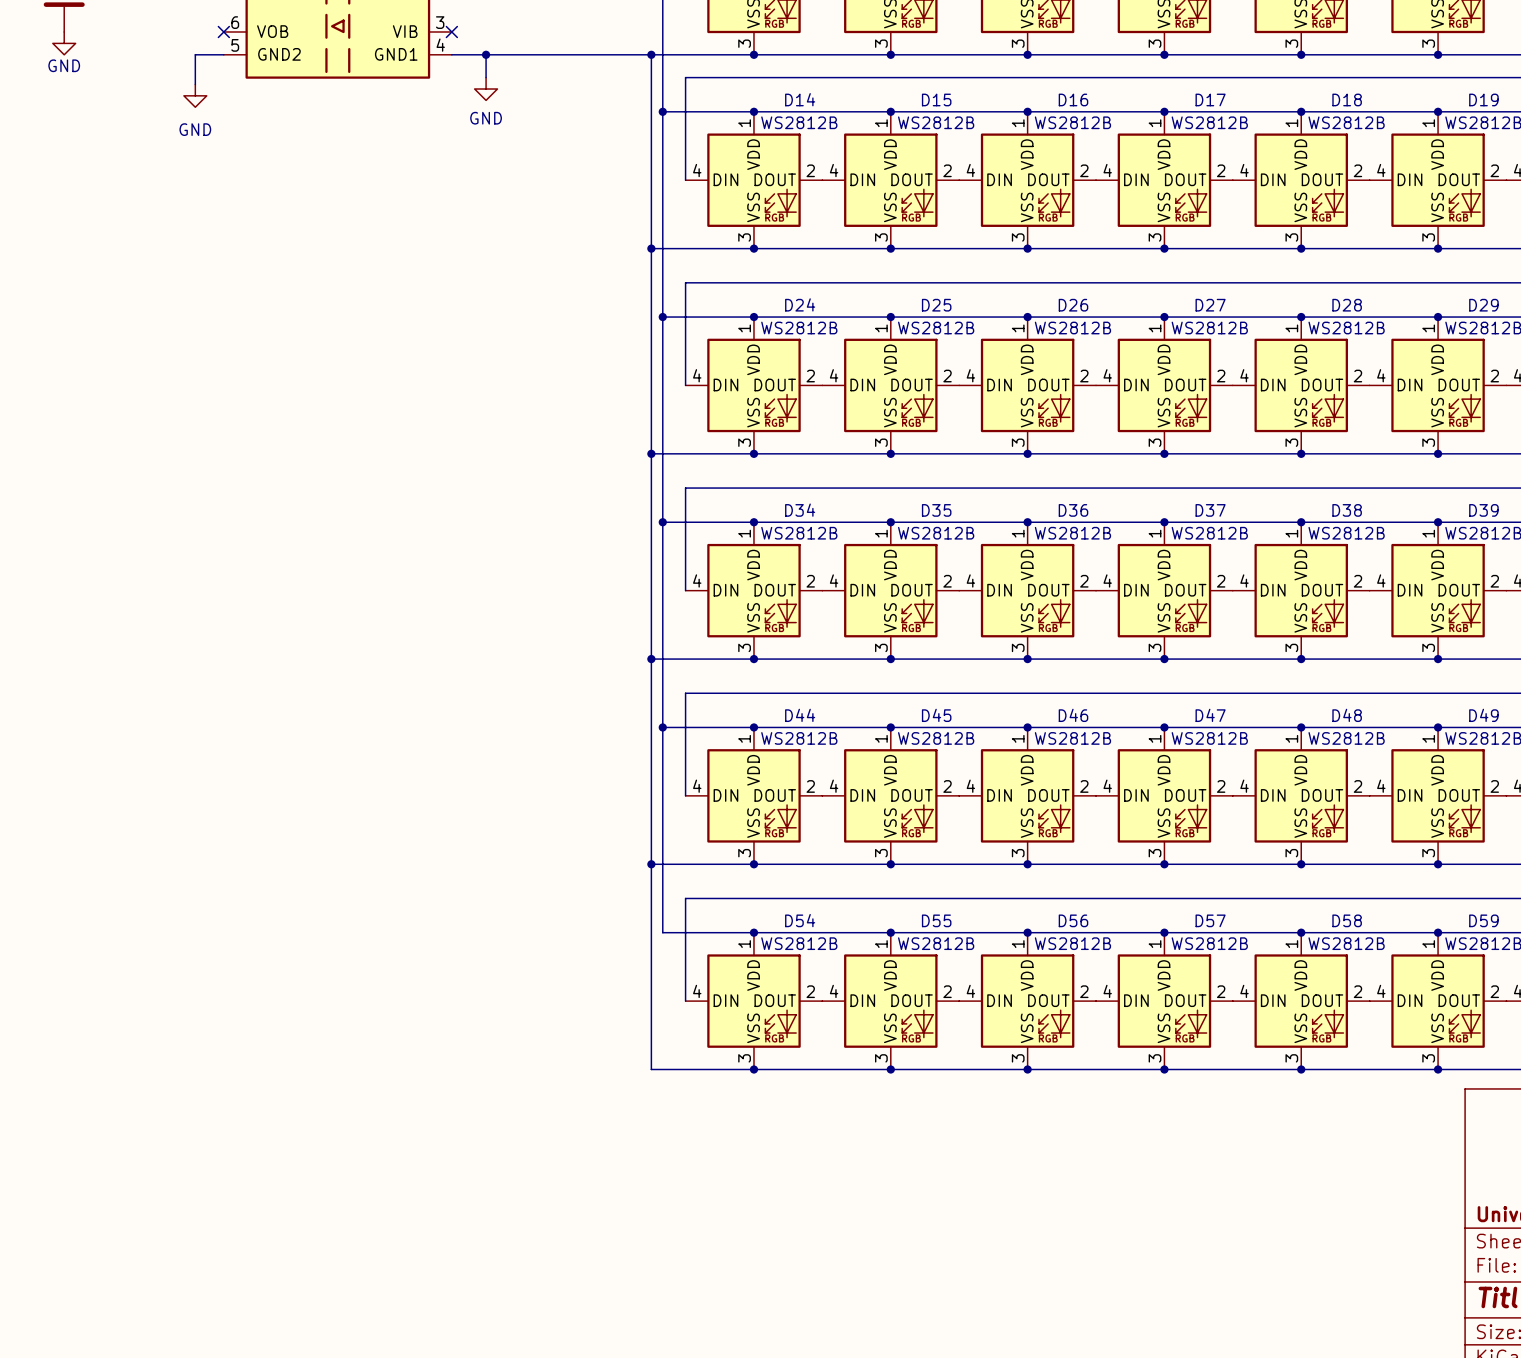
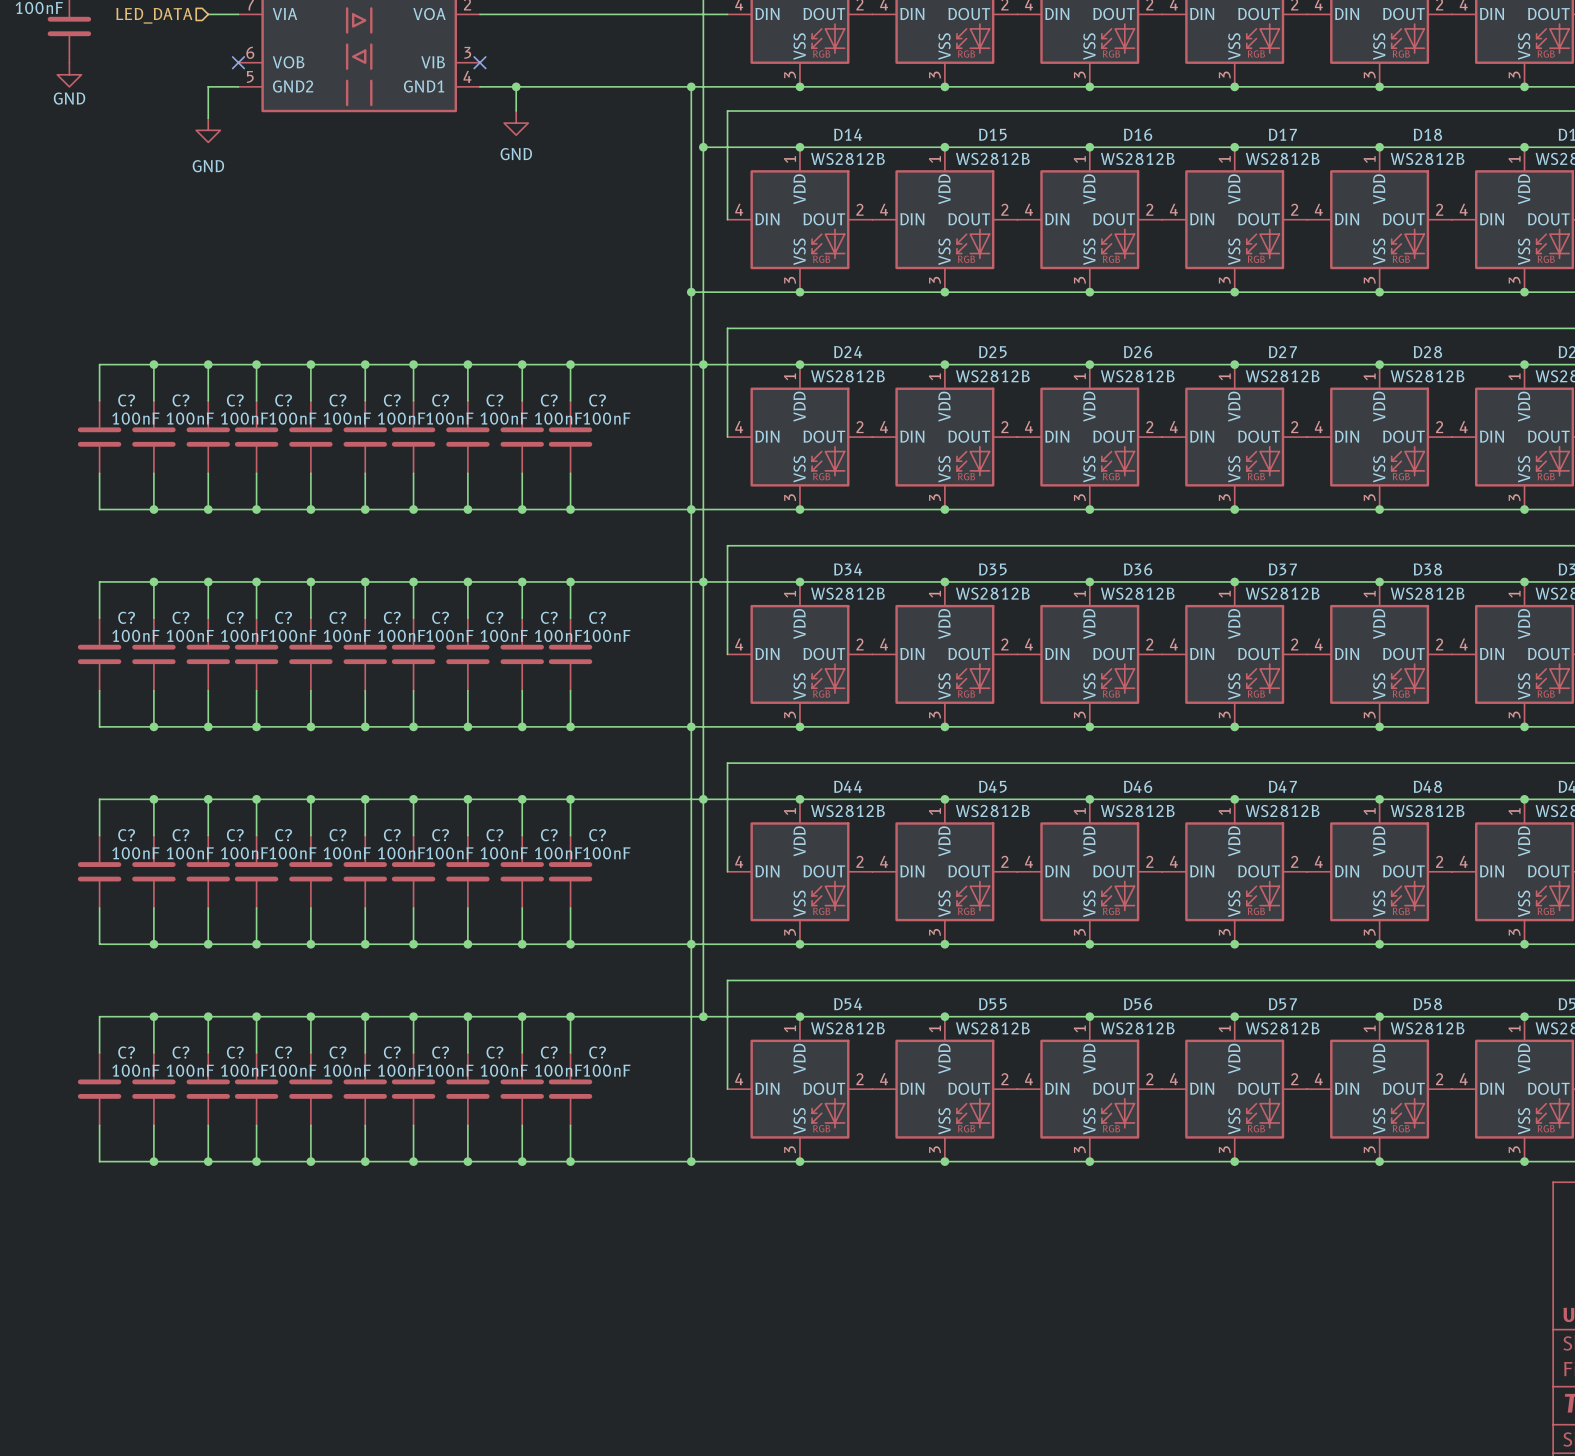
wire: none -> (153, 364) (153, 400)
junction: none -> (153, 364)
wire: none -> (208, 364) (208, 400)
junction: none -> (208, 364)
wire: none -> (256, 364) (256, 400)
junction: none -> (256, 364)
wire: none -> (310, 364) (310, 400)
junction: none -> (310, 364)
wire: none -> (365, 364) (365, 400)
junction: none -> (365, 364)
wire: none -> (413, 364) (413, 400)
junction: none -> (413, 364)
wire: none -> (467, 364) (467, 400)
junction: none -> (467, 364)
wire: none -> (522, 364) (522, 400)
junction: none -> (522, 364)
wire: none -> (570, 364) (570, 400)
junction: none -> (570, 364)
wire: none -> (703, 364) (99, 364) (99, 400)
C?: none -> 100nF (99, 437)
C?: none -> 100nF (153, 437)
C?: none -> 100nF (208, 437)
C?: none -> 100nF (256, 437)
C?: none -> 100nF (310, 437)
C?: none -> 100nF (365, 437)
C?: none -> 100nF (413, 437)
C?: none -> 100nF (467, 437)
C?: none -> 100nF (522, 437)
C?: none -> 100nF (570, 437)
wire: none -> (99, 473) (99, 509) (691, 509)
wire: none -> (153, 473) (153, 509)
wire: none -> (208, 473) (208, 509)
wire: none -> (256, 473) (256, 509)
wire: none -> (310, 473) (310, 509)
wire: none -> (365, 473) (365, 509)
wire: none -> (413, 473) (413, 509)
wire: none -> (467, 473) (467, 509)
wire: none -> (522, 473) (522, 509)
wire: none -> (570, 473) (570, 509)
junction: none -> (153, 509)
junction: none -> (208, 509)
junction: none -> (256, 509)
junction: none -> (310, 509)
junction: none -> (365, 509)
junction: none -> (413, 509)
junction: none -> (467, 509)
junction: none -> (522, 509)
junction: none -> (570, 509)
wire: none -> (153, 581) (153, 618)
junction: none -> (153, 581)
wire: none -> (208, 581) (208, 618)
junction: none -> (208, 581)
wire: none -> (256, 581) (256, 618)
junction: none -> (256, 581)
wire: none -> (310, 581) (310, 618)
junction: none -> (310, 581)
wire: none -> (365, 581) (365, 618)
junction: none -> (365, 581)
wire: none -> (413, 581) (413, 618)
junction: none -> (413, 581)
wire: none -> (467, 581) (467, 618)
junction: none -> (467, 581)
wire: none -> (522, 581) (522, 618)
junction: none -> (522, 581)
wire: none -> (570, 581) (570, 618)
junction: none -> (570, 581)
wire: none -> (703, 581) (99, 581) (99, 618)
C?: none -> 100nF (99, 654)
C?: none -> 100nF (153, 654)
C?: none -> 100nF (208, 654)
C?: none -> 100nF (256, 654)
C?: none -> 100nF (310, 654)
C?: none -> 100nF (365, 654)
C?: none -> 100nF (413, 654)
C?: none -> 100nF (467, 654)
C?: none -> 100nF (522, 654)
C?: none -> 100nF (570, 654)
wire: none -> (99, 690) (99, 726) (691, 726)
wire: none -> (153, 690) (153, 726)
wire: none -> (208, 690) (208, 726)
wire: none -> (256, 690) (256, 726)
wire: none -> (310, 690) (310, 726)
wire: none -> (365, 690) (365, 726)
wire: none -> (413, 690) (413, 726)
wire: none -> (467, 690) (467, 726)
wire: none -> (522, 690) (522, 726)
wire: none -> (570, 690) (570, 726)
junction: none -> (153, 726)
junction: none -> (208, 726)
junction: none -> (256, 726)
junction: none -> (310, 726)
junction: none -> (365, 726)
junction: none -> (413, 726)
junction: none -> (467, 726)
junction: none -> (522, 726)
junction: none -> (570, 726)
wire: none -> (153, 799) (153, 835)
junction: none -> (153, 799)
wire: none -> (208, 799) (208, 835)
junction: none -> (208, 799)
wire: none -> (256, 799) (256, 835)
junction: none -> (256, 799)
wire: none -> (310, 799) (310, 835)
junction: none -> (310, 799)
wire: none -> (365, 799) (365, 835)
junction: none -> (365, 799)
wire: none -> (413, 799) (413, 835)
junction: none -> (413, 799)
wire: none -> (467, 799) (467, 835)
junction: none -> (467, 799)
wire: none -> (522, 799) (522, 835)
junction: none -> (522, 799)
wire: none -> (570, 799) (570, 835)
junction: none -> (570, 799)
wire: none -> (703, 799) (99, 799) (99, 835)
C?: none -> 100nF (99, 871)
C?: none -> 100nF (153, 871)
C?: none -> 100nF (208, 871)
C?: none -> 100nF (256, 871)
C?: none -> 100nF (310, 871)
C?: none -> 100nF (365, 871)
C?: none -> 100nF (413, 871)
C?: none -> 100nF (467, 871)
C?: none -> 100nF (522, 871)
C?: none -> 100nF (570, 871)
wire: none -> (99, 908) (99, 944) (691, 944)
wire: none -> (153, 908) (153, 944)
wire: none -> (208, 908) (208, 944)
wire: none -> (256, 908) (256, 944)
wire: none -> (310, 908) (310, 944)
wire: none -> (365, 908) (365, 944)
wire: none -> (413, 908) (413, 944)
wire: none -> (467, 908) (467, 944)
wire: none -> (522, 908) (522, 944)
wire: none -> (570, 908) (570, 944)
junction: none -> (153, 944)
junction: none -> (208, 944)
junction: none -> (256, 944)
junction: none -> (310, 944)
junction: none -> (365, 944)
junction: none -> (413, 944)
junction: none -> (467, 944)
junction: none -> (522, 944)
junction: none -> (570, 944)
wire: none -> (153, 1016) (153, 1052)
junction: none -> (153, 1016)
wire: none -> (208, 1016) (208, 1052)
junction: none -> (208, 1016)
wire: none -> (256, 1016) (256, 1052)
junction: none -> (256, 1016)
wire: none -> (310, 1016) (310, 1052)
junction: none -> (310, 1016)
wire: none -> (365, 1016) (365, 1052)
junction: none -> (365, 1016)
wire: none -> (413, 1016) (413, 1052)
junction: none -> (413, 1016)
wire: none -> (467, 1016) (467, 1052)
junction: none -> (467, 1016)
wire: none -> (522, 1016) (522, 1052)
junction: none -> (522, 1016)
wire: none -> (570, 1016) (570, 1052)
junction: none -> (570, 1016)
wire: none -> (703, 1016) (99, 1016) (99, 1052)
junction: none -> (703, 1016)
C?: none -> 100nF (99, 1089)
C?: none -> 100nF (153, 1089)
C?: none -> 100nF (208, 1089)
C?: none -> 100nF (256, 1089)
C?: none -> 100nF (310, 1089)
C?: none -> 100nF (365, 1089)
C?: none -> 100nF (413, 1089)
C?: none -> 100nF (467, 1089)
C?: none -> 100nF (522, 1089)
C?: none -> 100nF (570, 1089)
wire: none -> (99, 1125) (99, 1161) (691, 1161)
wire: none -> (153, 1125) (153, 1161)
wire: none -> (208, 1125) (208, 1161)
wire: none -> (256, 1125) (256, 1161)
wire: none -> (310, 1125) (310, 1161)
wire: none -> (365, 1125) (365, 1161)
wire: none -> (413, 1125) (413, 1161)
wire: none -> (467, 1125) (467, 1161)
wire: none -> (522, 1125) (522, 1161)
wire: none -> (570, 1125) (570, 1161)
junction: none -> (153, 1161)
junction: none -> (208, 1161)
junction: none -> (256, 1161)
junction: none -> (310, 1161)
junction: none -> (365, 1161)
junction: none -> (413, 1161)
junction: none -> (467, 1161)
junction: none -> (522, 1161)
junction: none -> (570, 1161)
junction: none -> (691, 1161)

